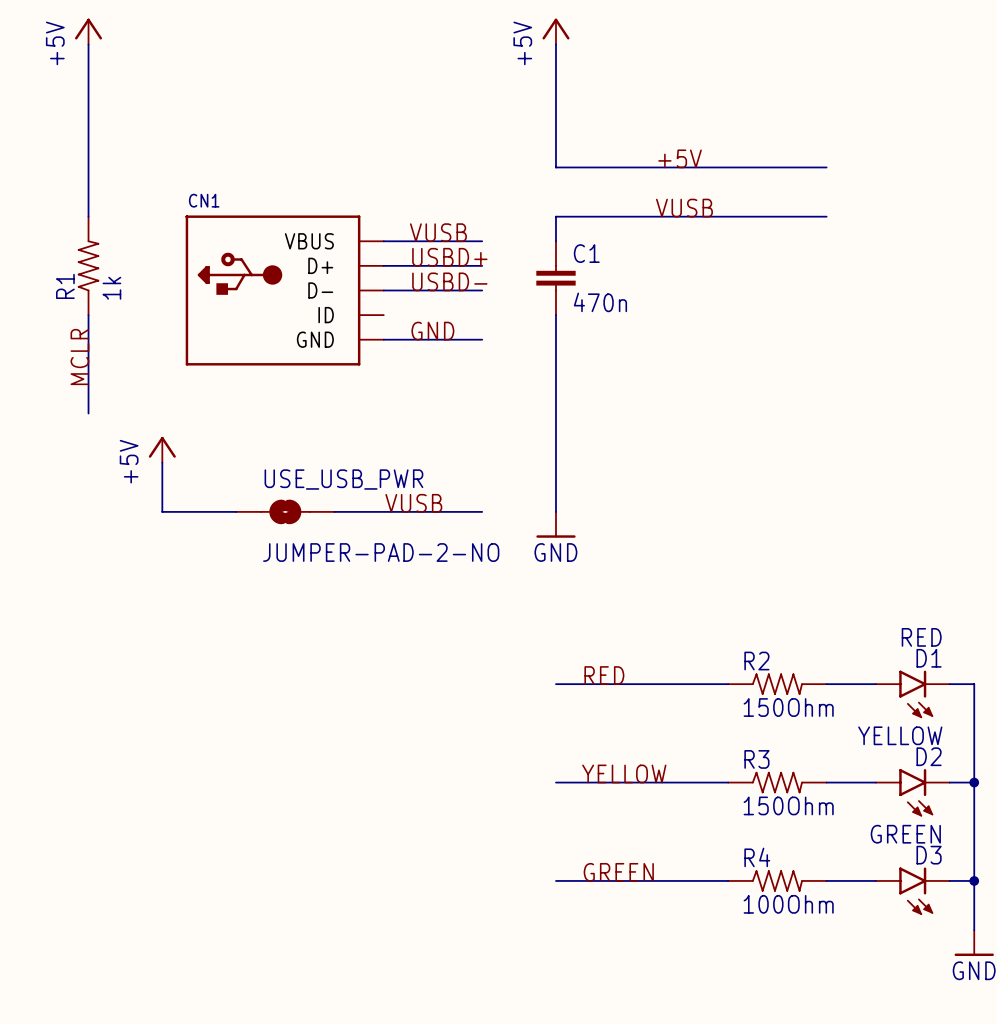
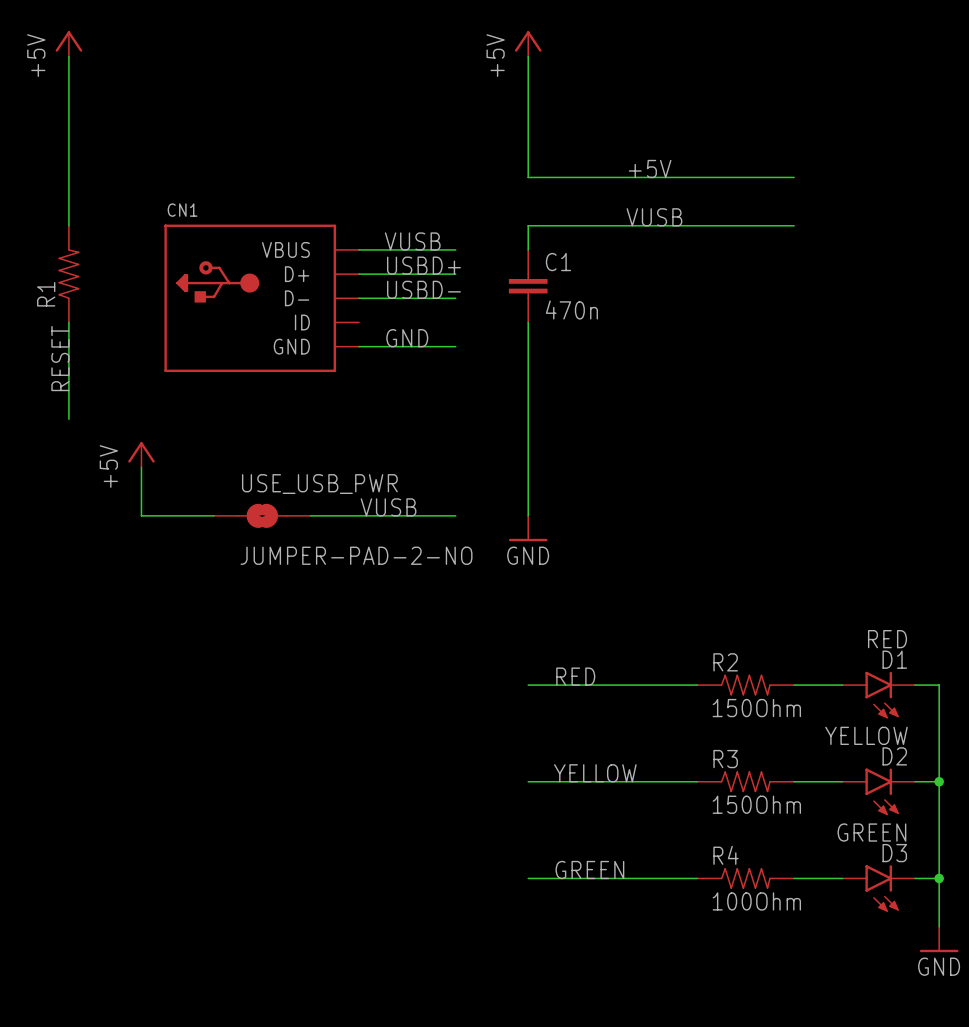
R1 value: 1k (111, 288) -> none
label: MCLR (79, 357) -> RESET (60, 358)

